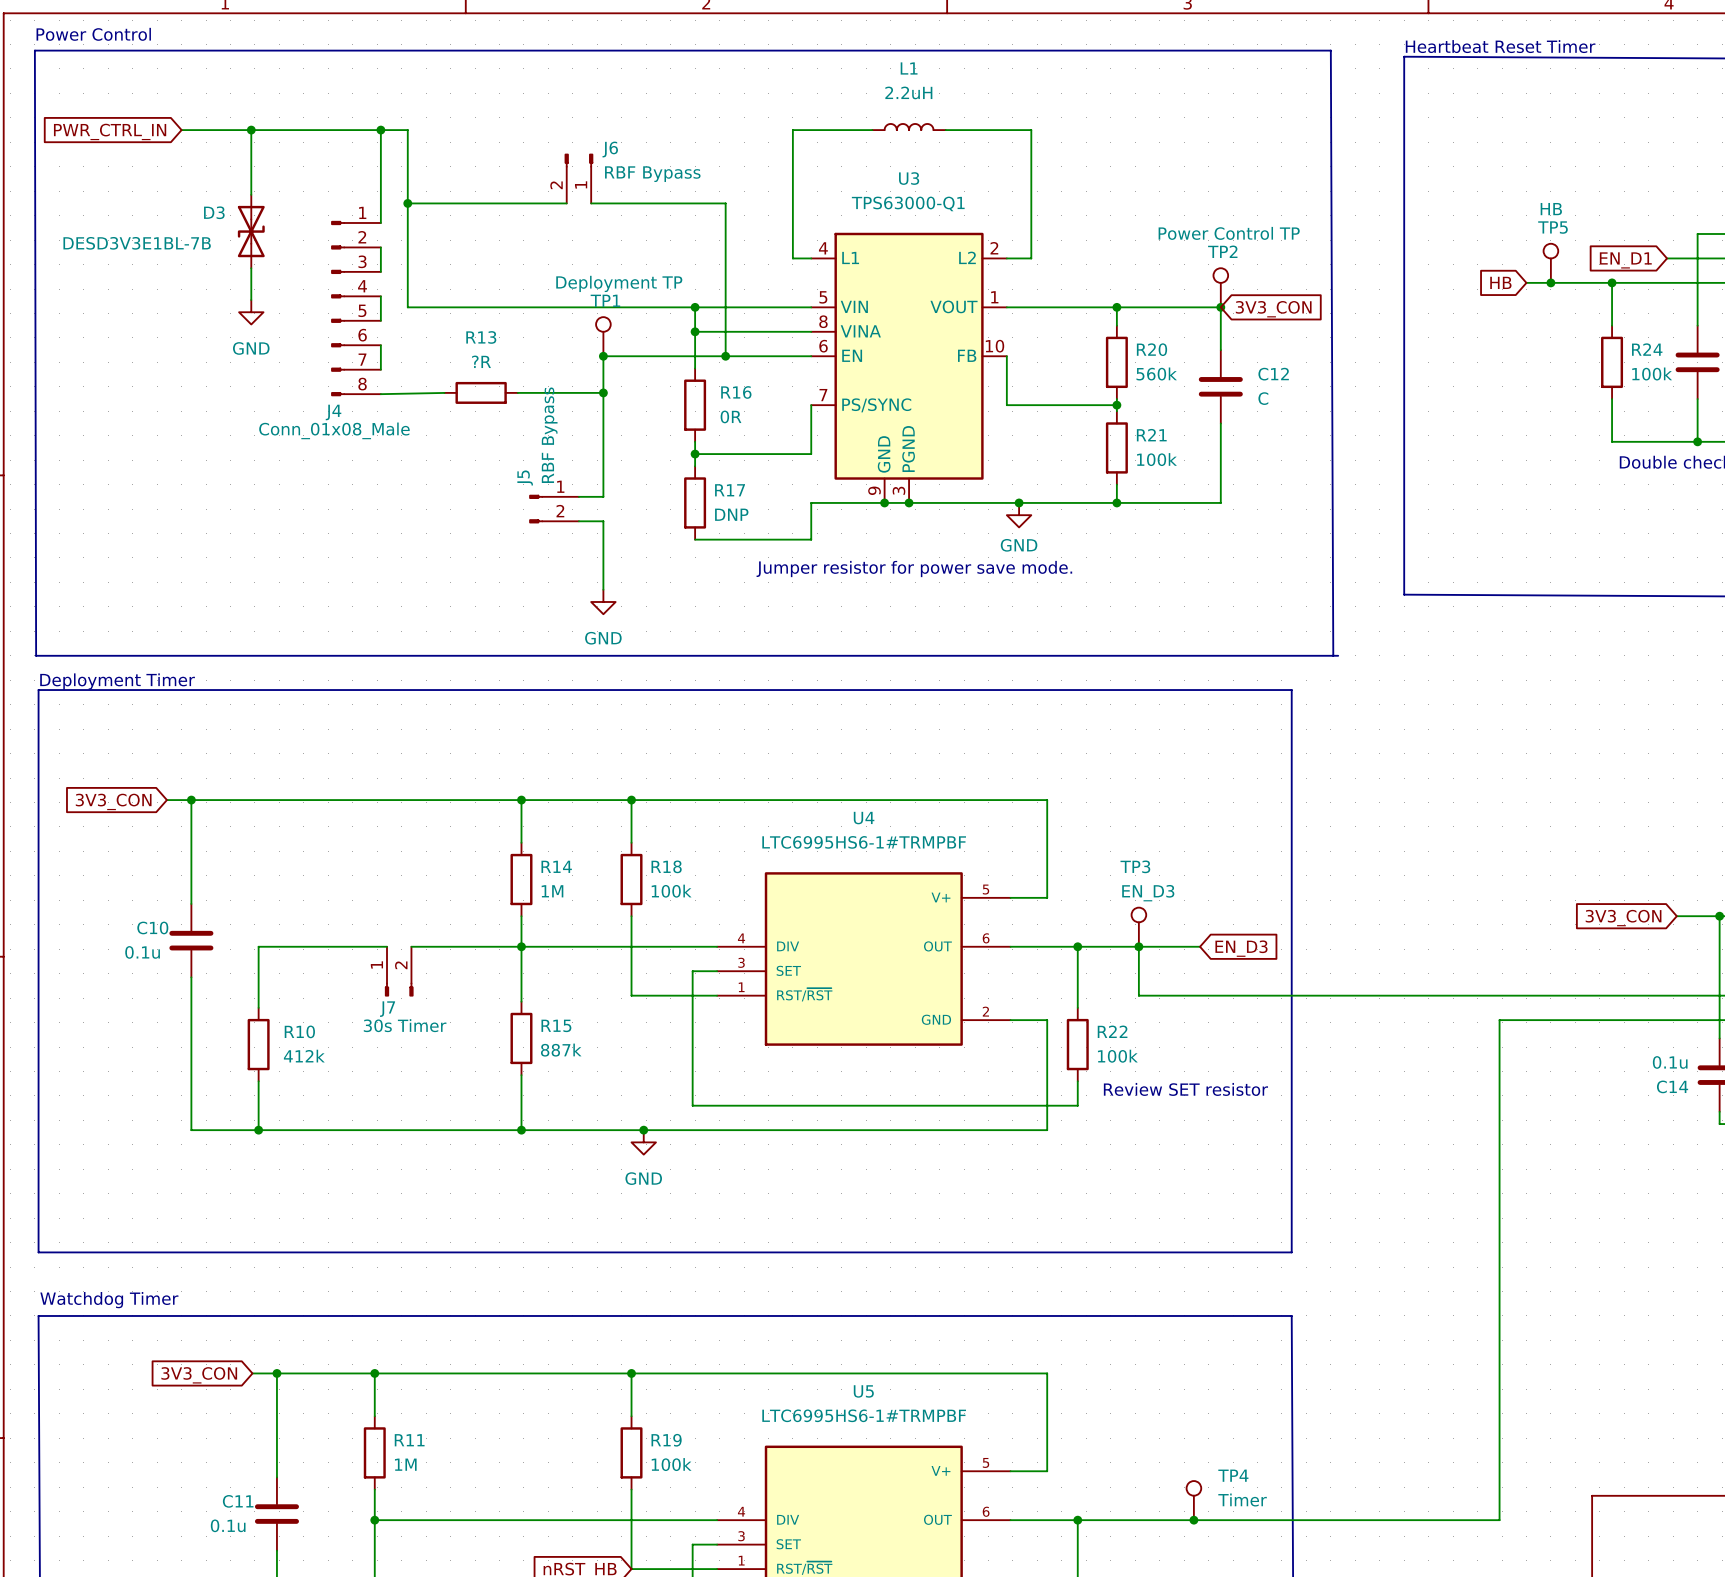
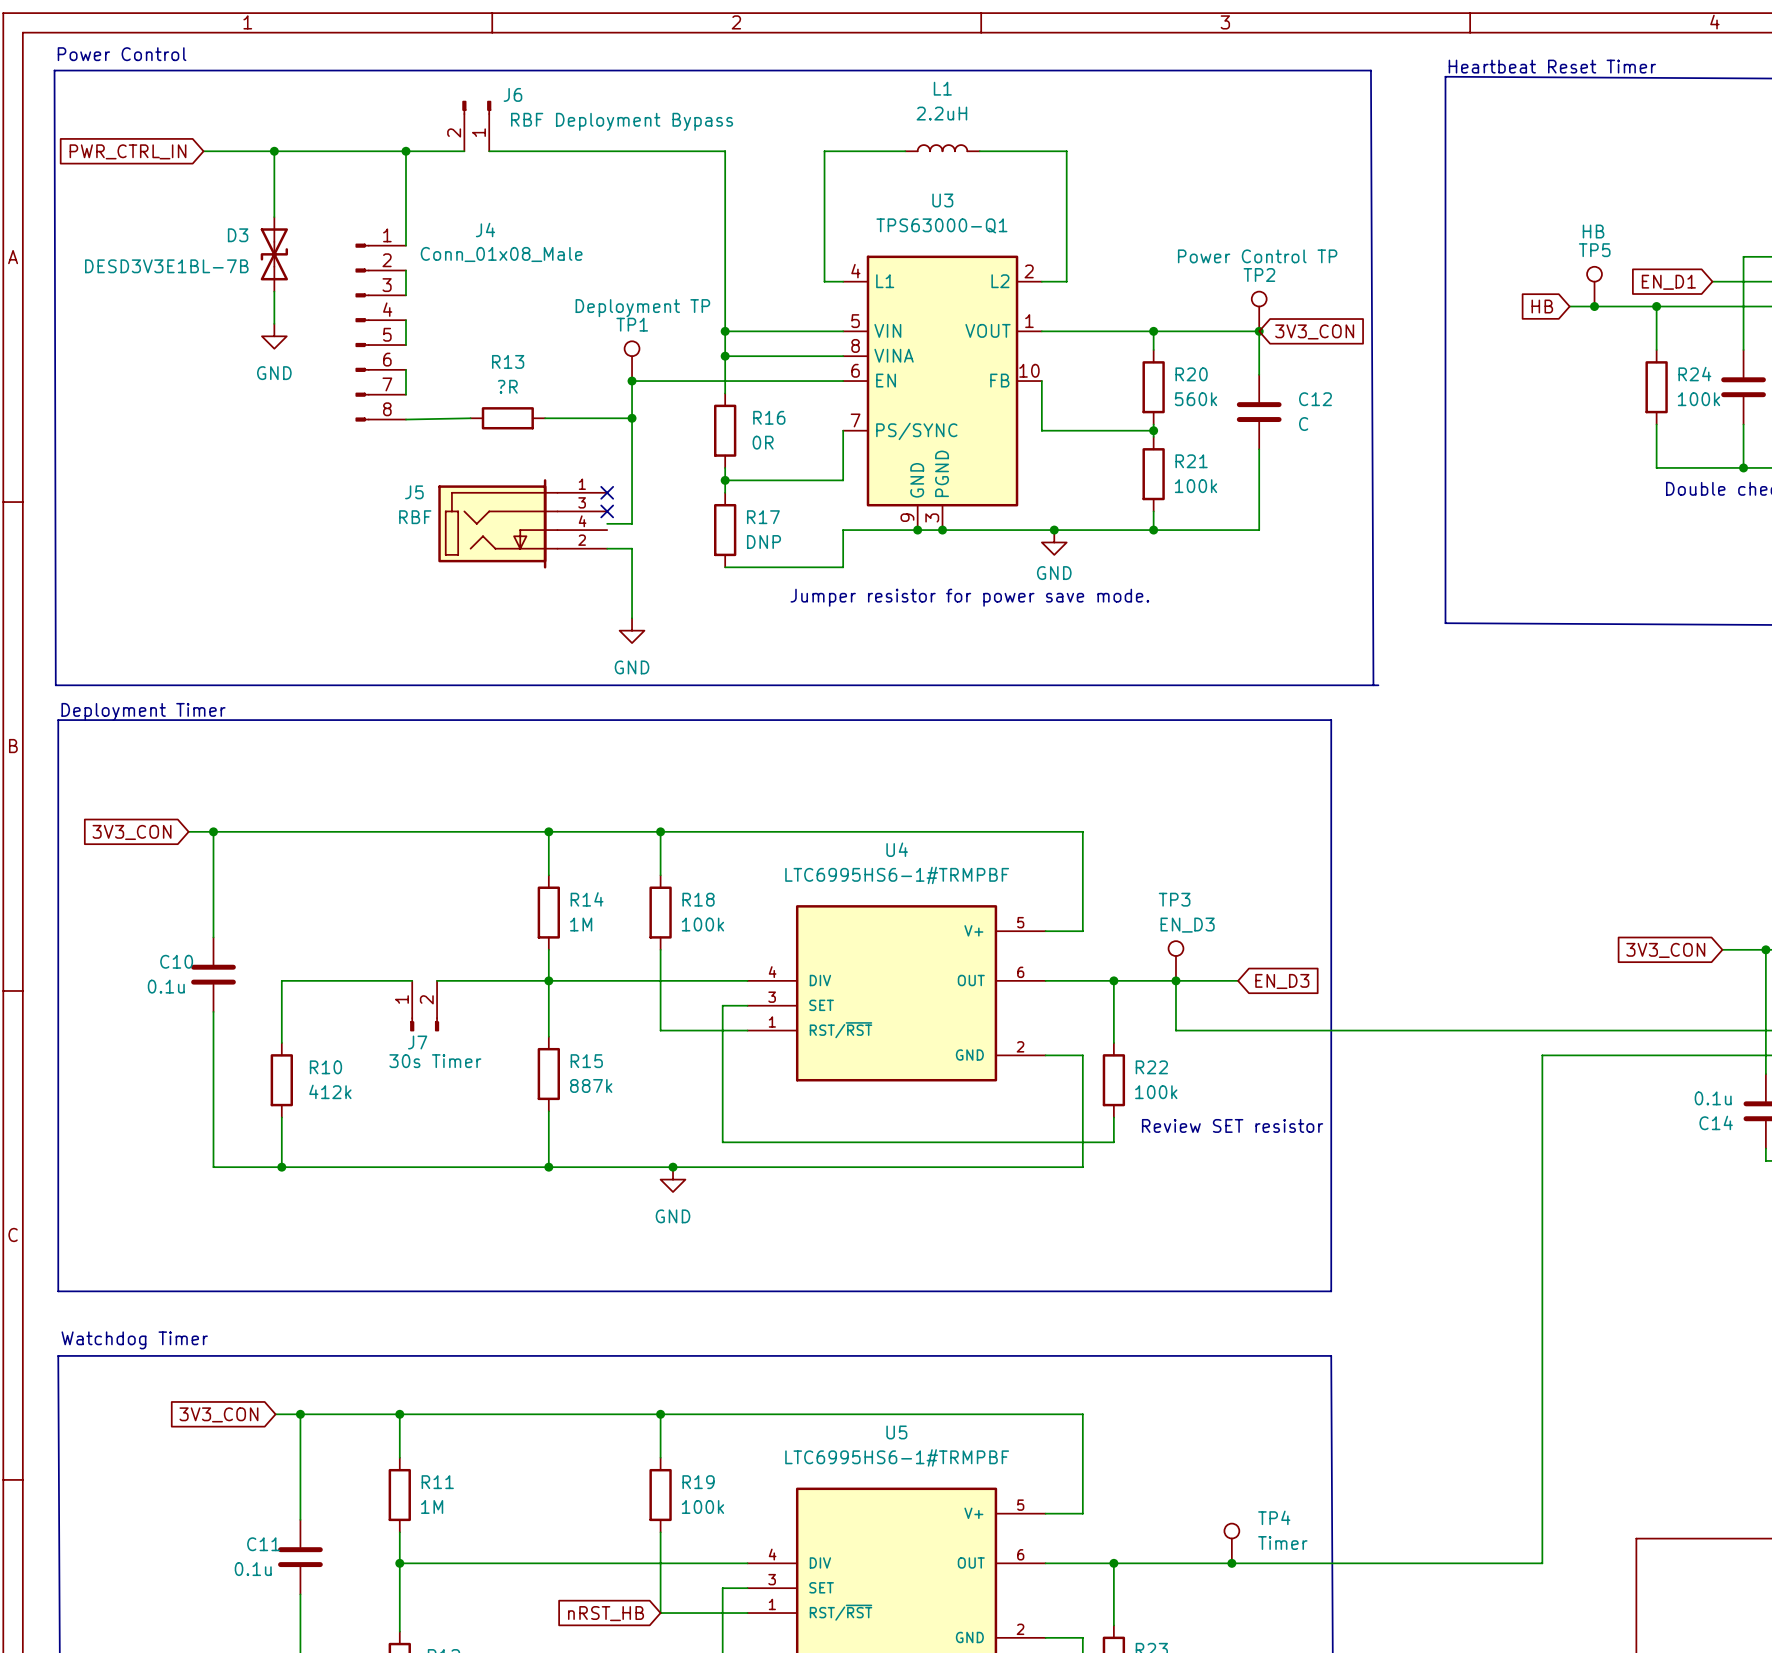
wire: (407, 130) (407, 307) (695, 307) -> (489, 151) (725, 151) (725, 331)
wire: none -> (433, 151) (464, 151)
J6 value: RBF Bypass (652, 174) -> RBF Deployment Bypass (622, 121)
J6 position: (578, 178) -> (476, 126)
wire: (407, 203) (566, 203) -> none
junction: (407, 203) -> none
wire: (591, 203) (725, 203) (725, 356) -> none
junction: (725, 356) -> none
J4 name position: J4 (333, 412) -> J4 (485, 229)
J4 value position: Conn_01x08_Male (334, 430) -> Conn_01x08_Male (501, 254)
J5 value: RBF Bypass (549, 435) -> RBF (415, 517)
no-connect mark: none -> (607, 492)
J5 name position: J5 (525, 477) -> J5 (414, 492)
no-connect mark: none -> (607, 511)
J5 symbol: [529, 494, 579, 524] -> [438, 479, 608, 569]

